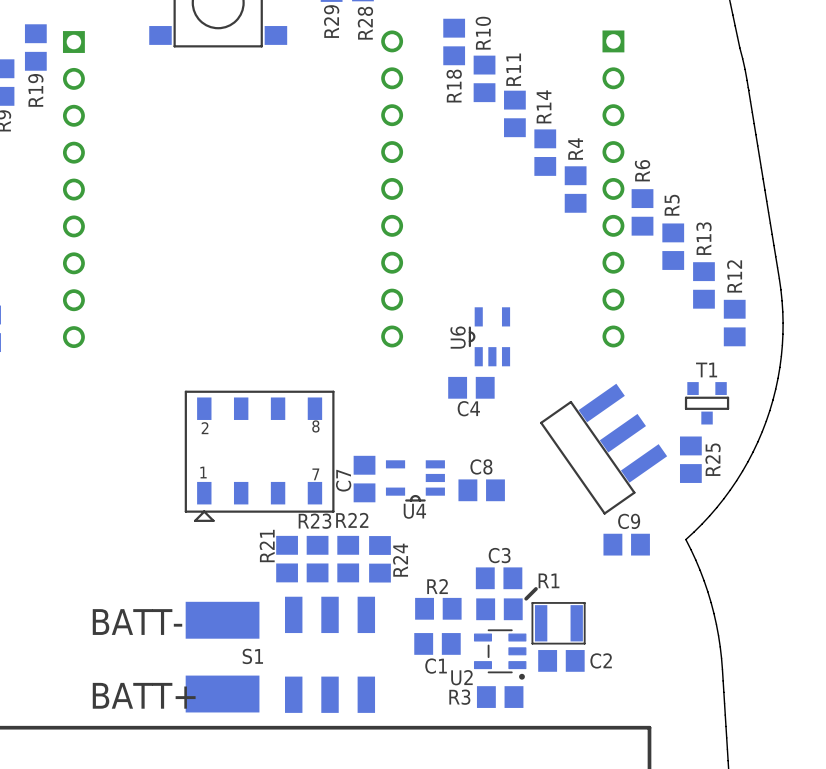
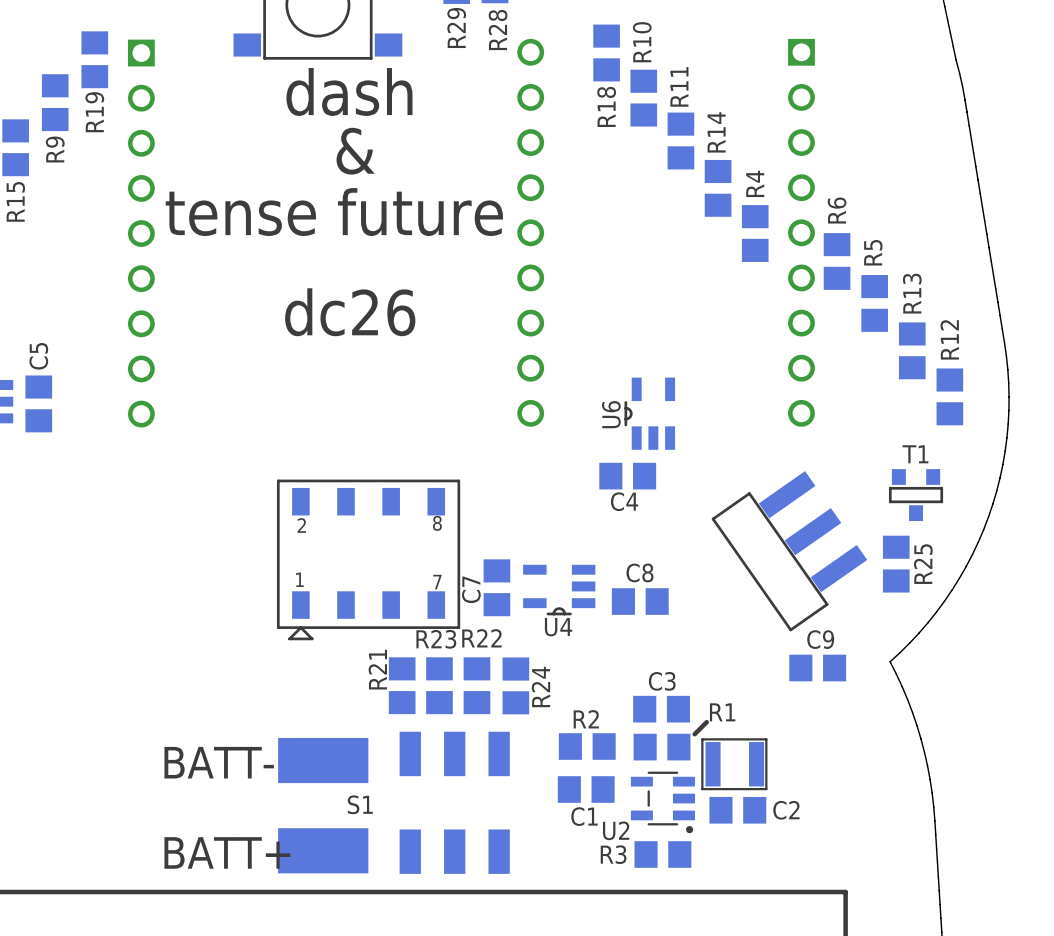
text: none -> dash (349, 91)
text: none -> & (355, 151)
text: none -> tense future (334, 212)
text: none -> dc26 (350, 312)

